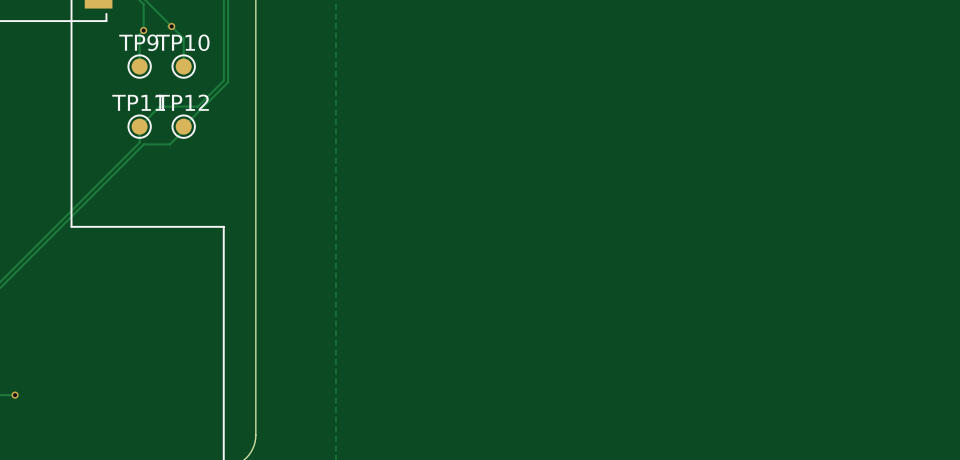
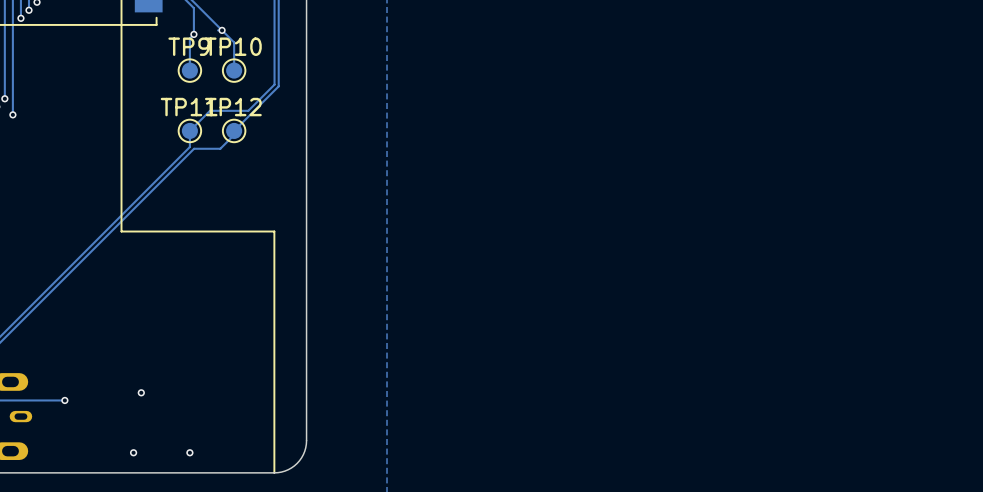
via: none -> (141, 392)
via: none -> (133, 452)
via: none -> (189, 452)

